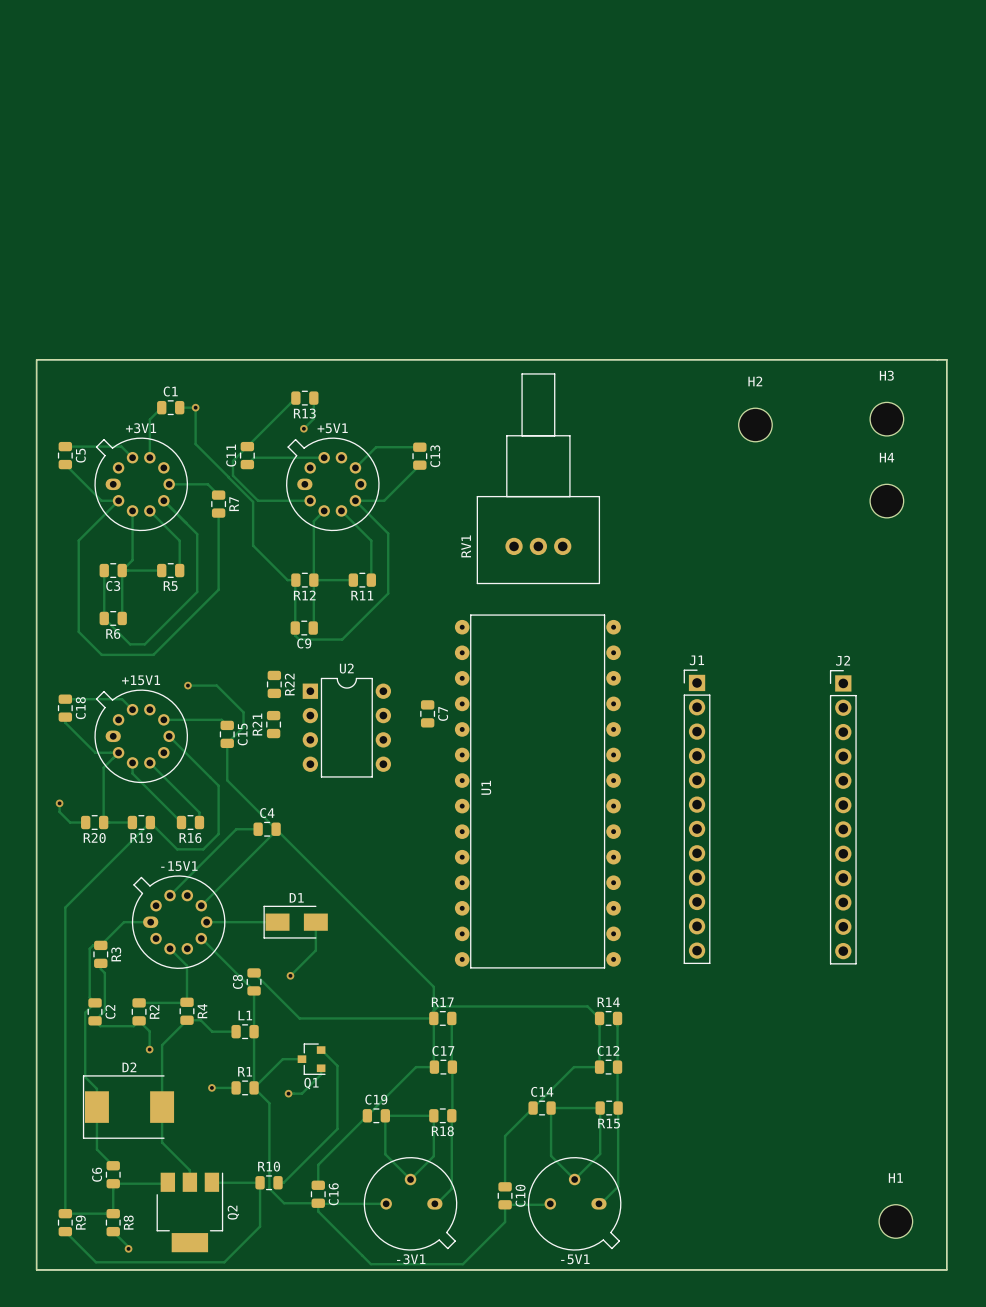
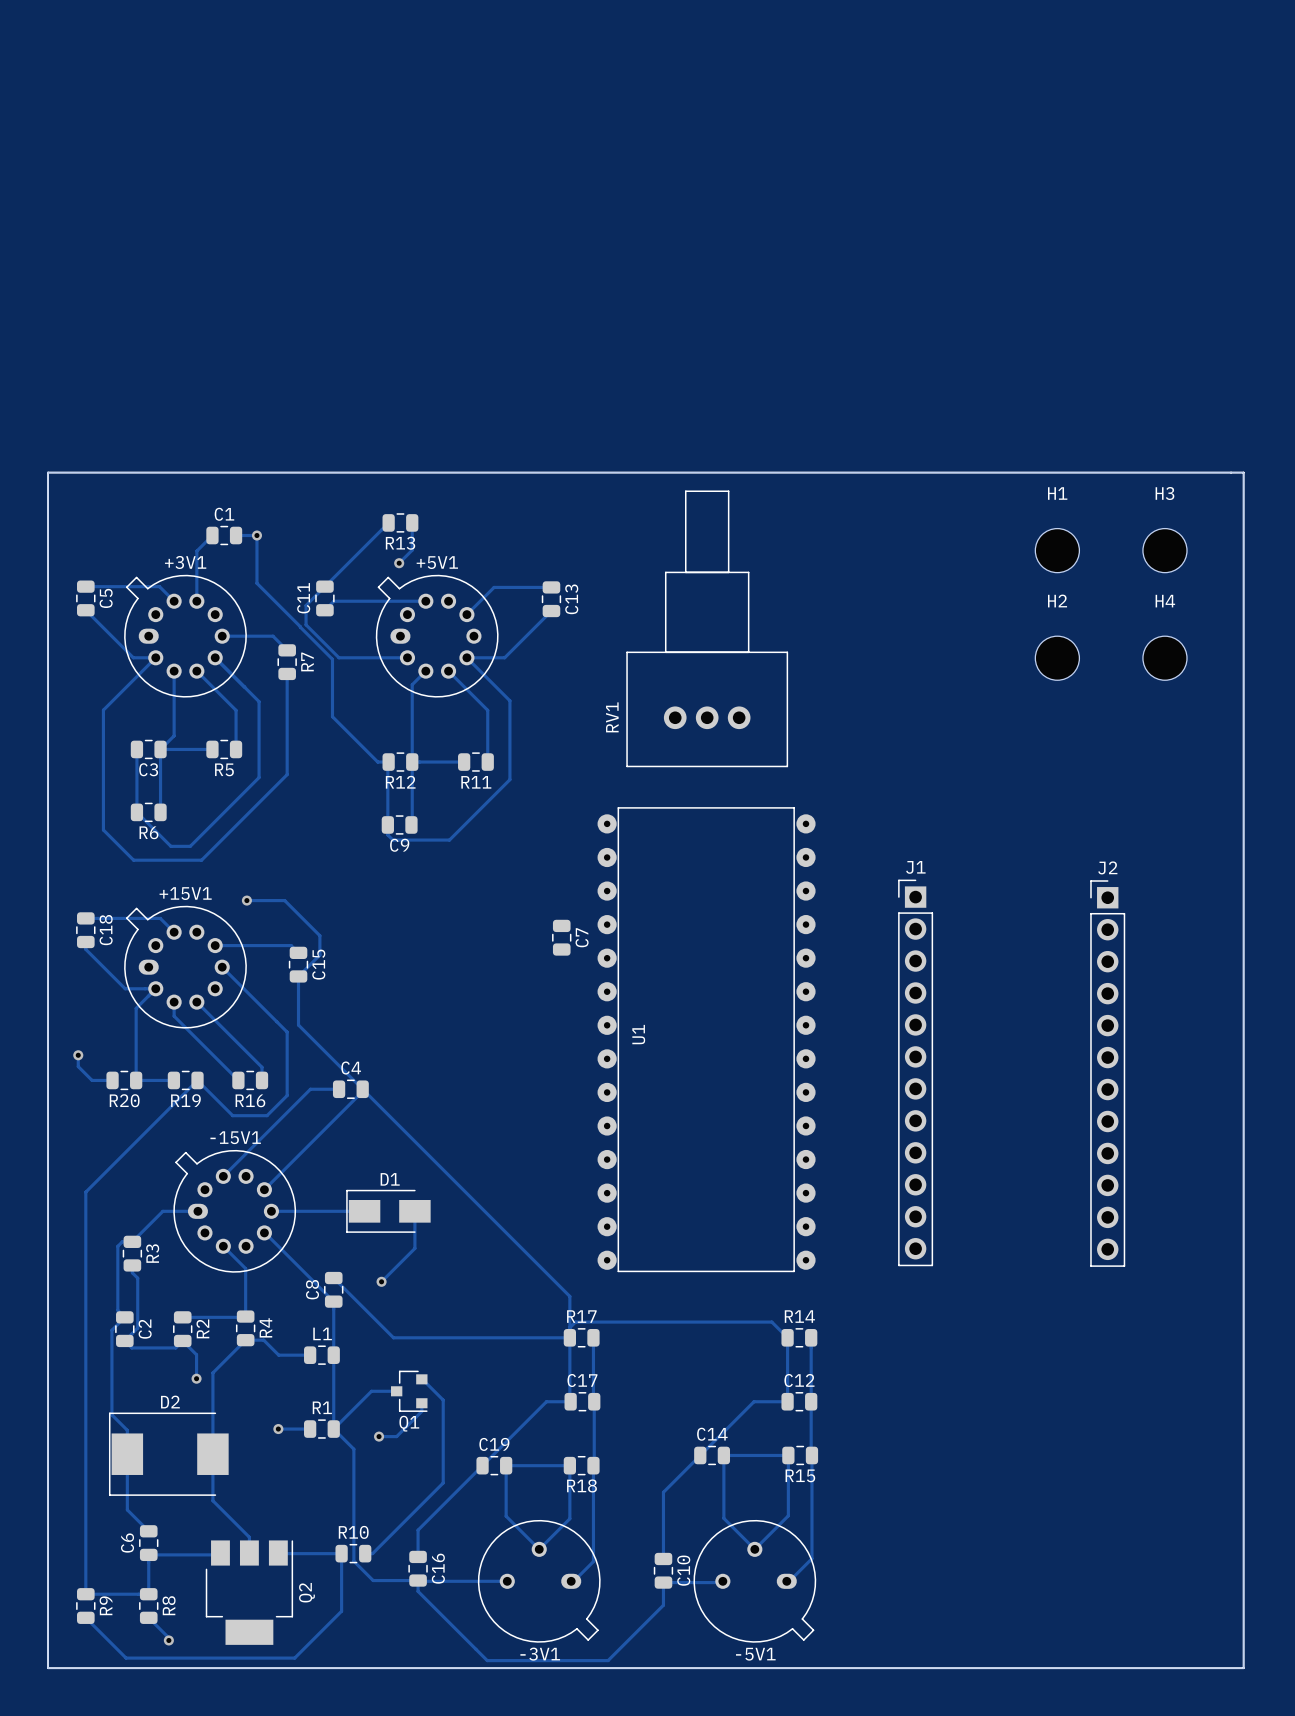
H2 position: (755, 424) -> (1057, 658)
R22: (274, 684) -> none
R21: (273, 724) -> none
U2: (346, 727) -> none
H1 position: (895, 1221) -> (1057, 550)

